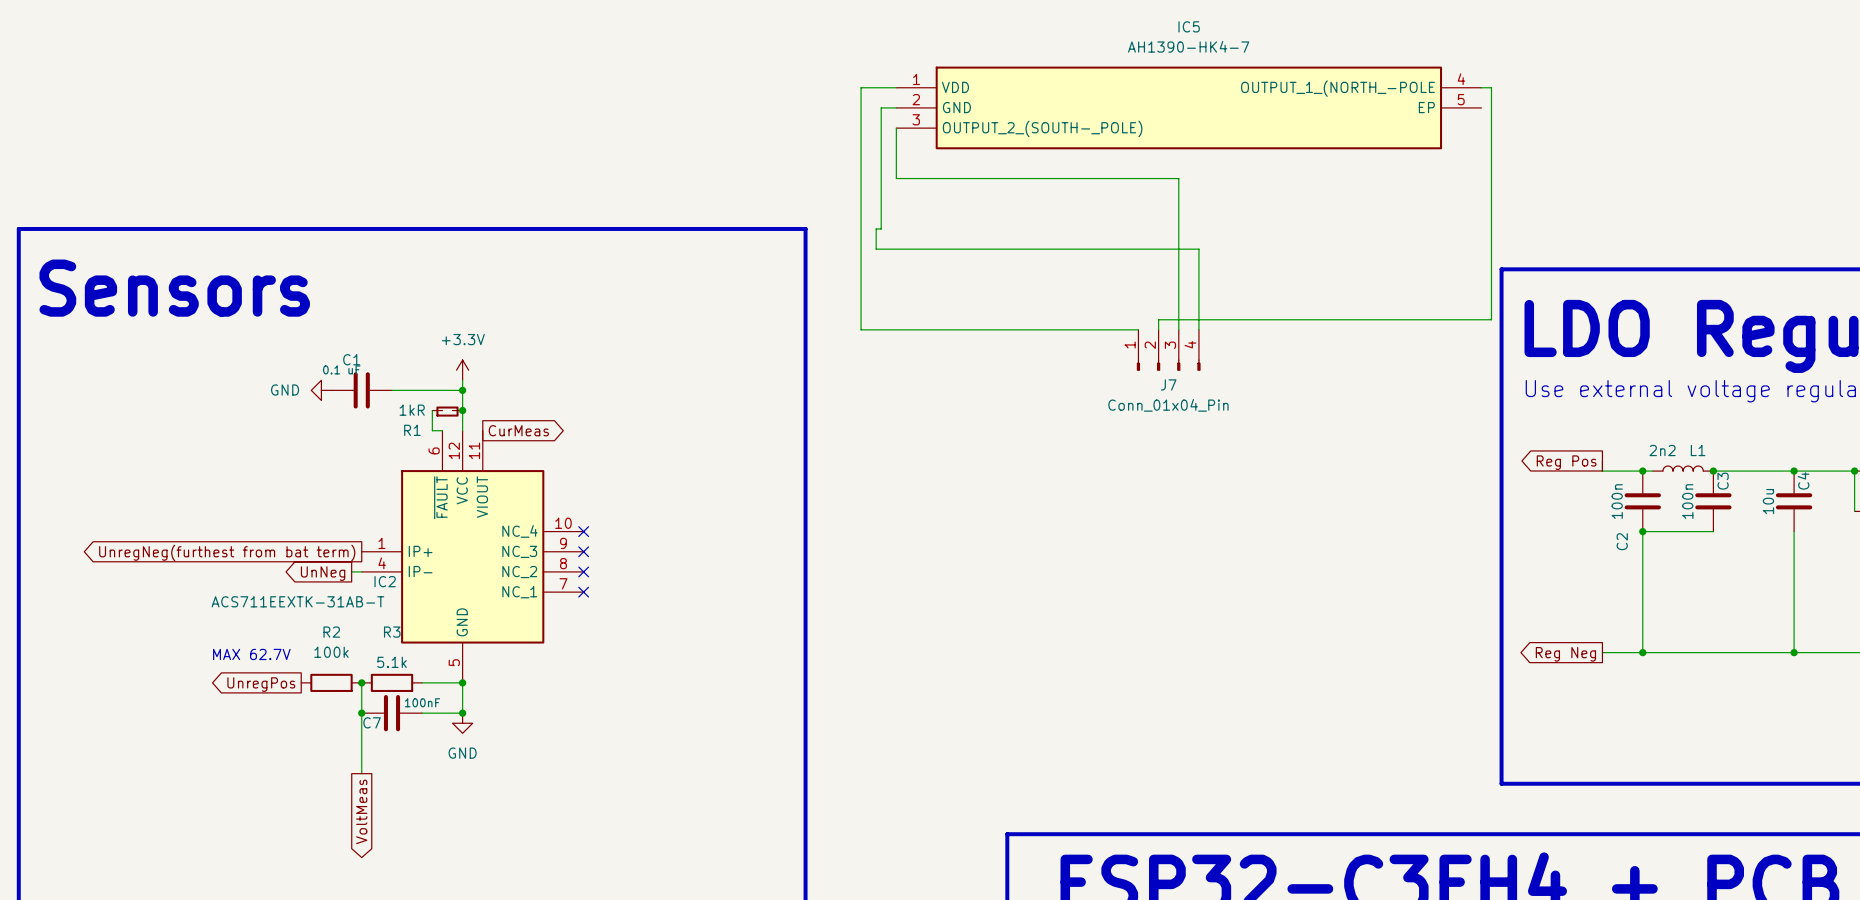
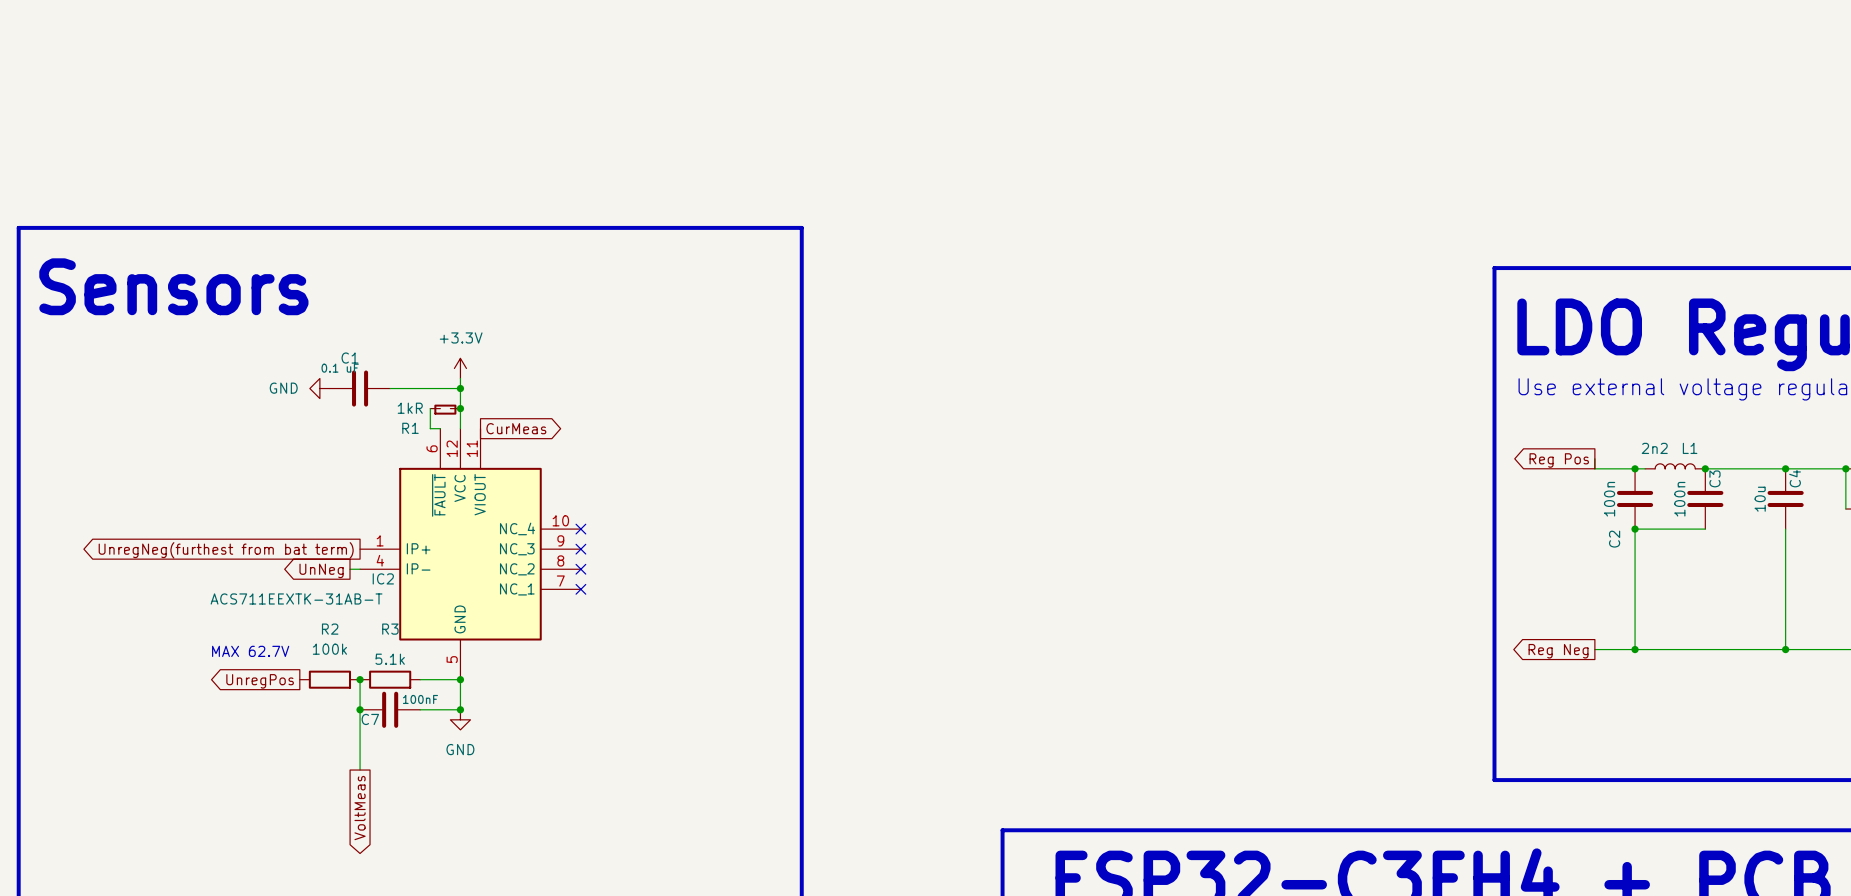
wire: (896, 87) (861, 87) (861, 329) (1138, 329) -> none
wire: (1481, 87) (1491, 87) (1491, 319) (1158, 319) (1158, 329) -> none
wire: (896, 107) (881, 107) (881, 228) (876, 228) (876, 249) (1198, 249) (1198, 329) -> none
IC5: AH1390-HK4-7 (1188, 107) -> none
wire: (896, 128) (896, 178) (1178, 178) (1178, 329) -> none
J7: Conn_01x04_Pin (1168, 350) -> none

